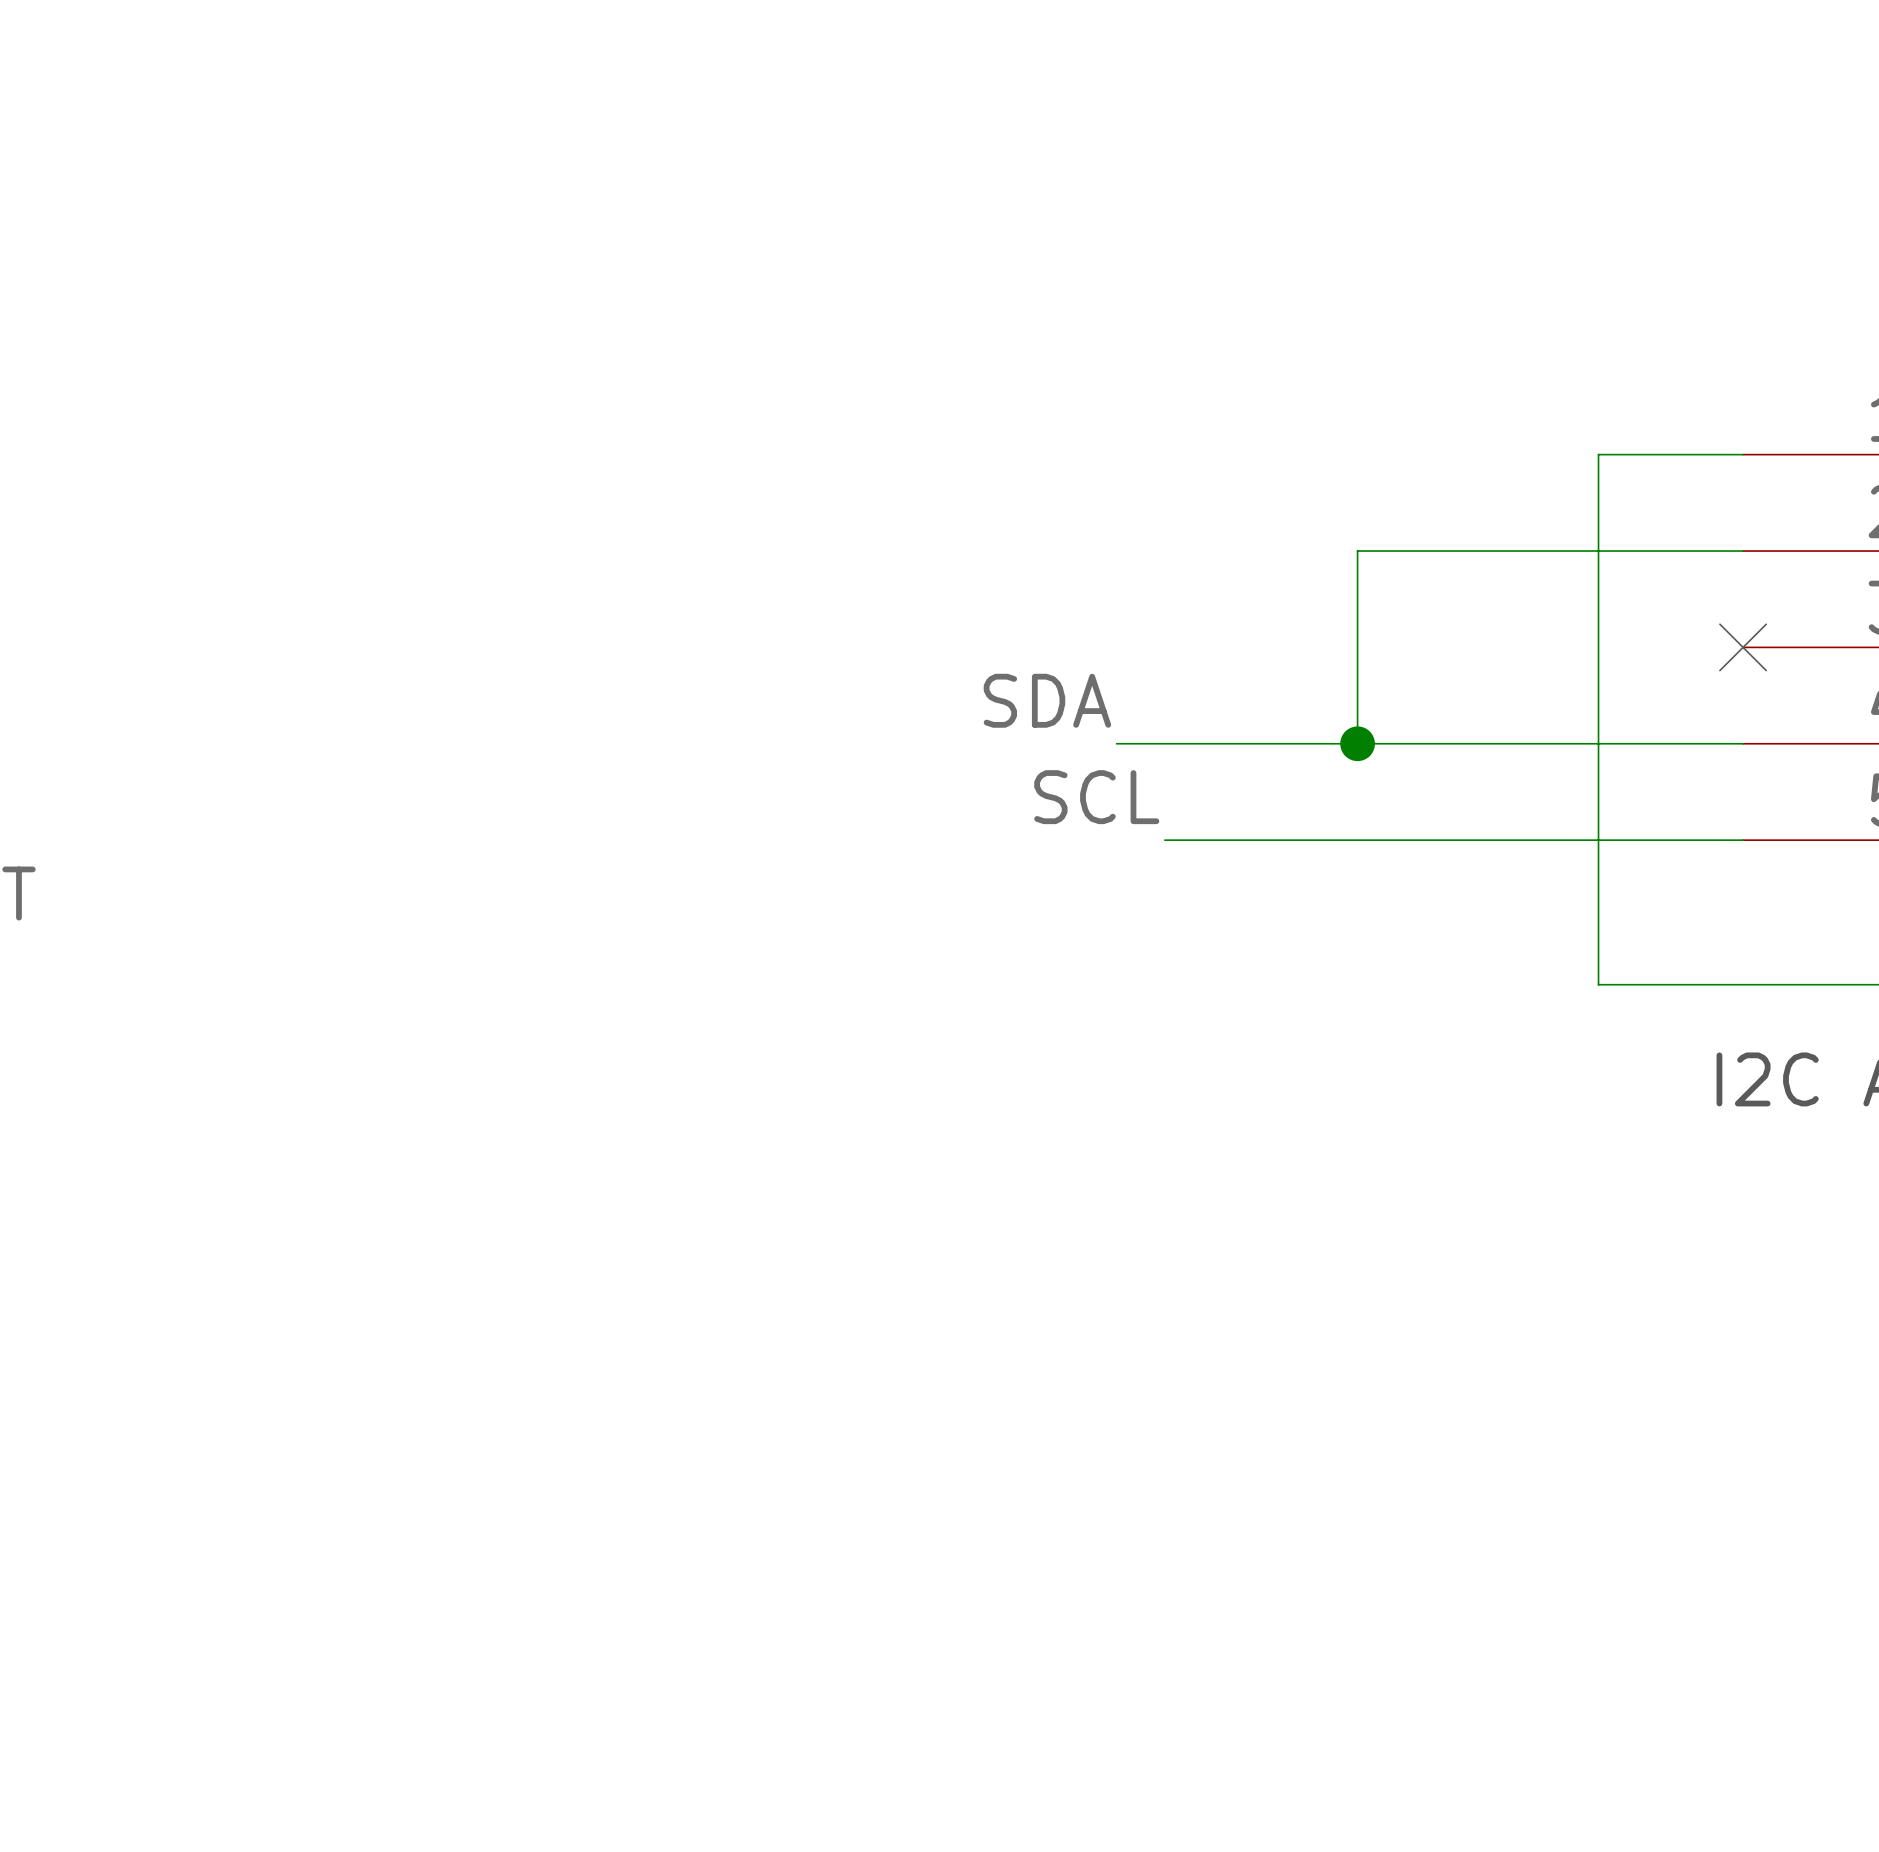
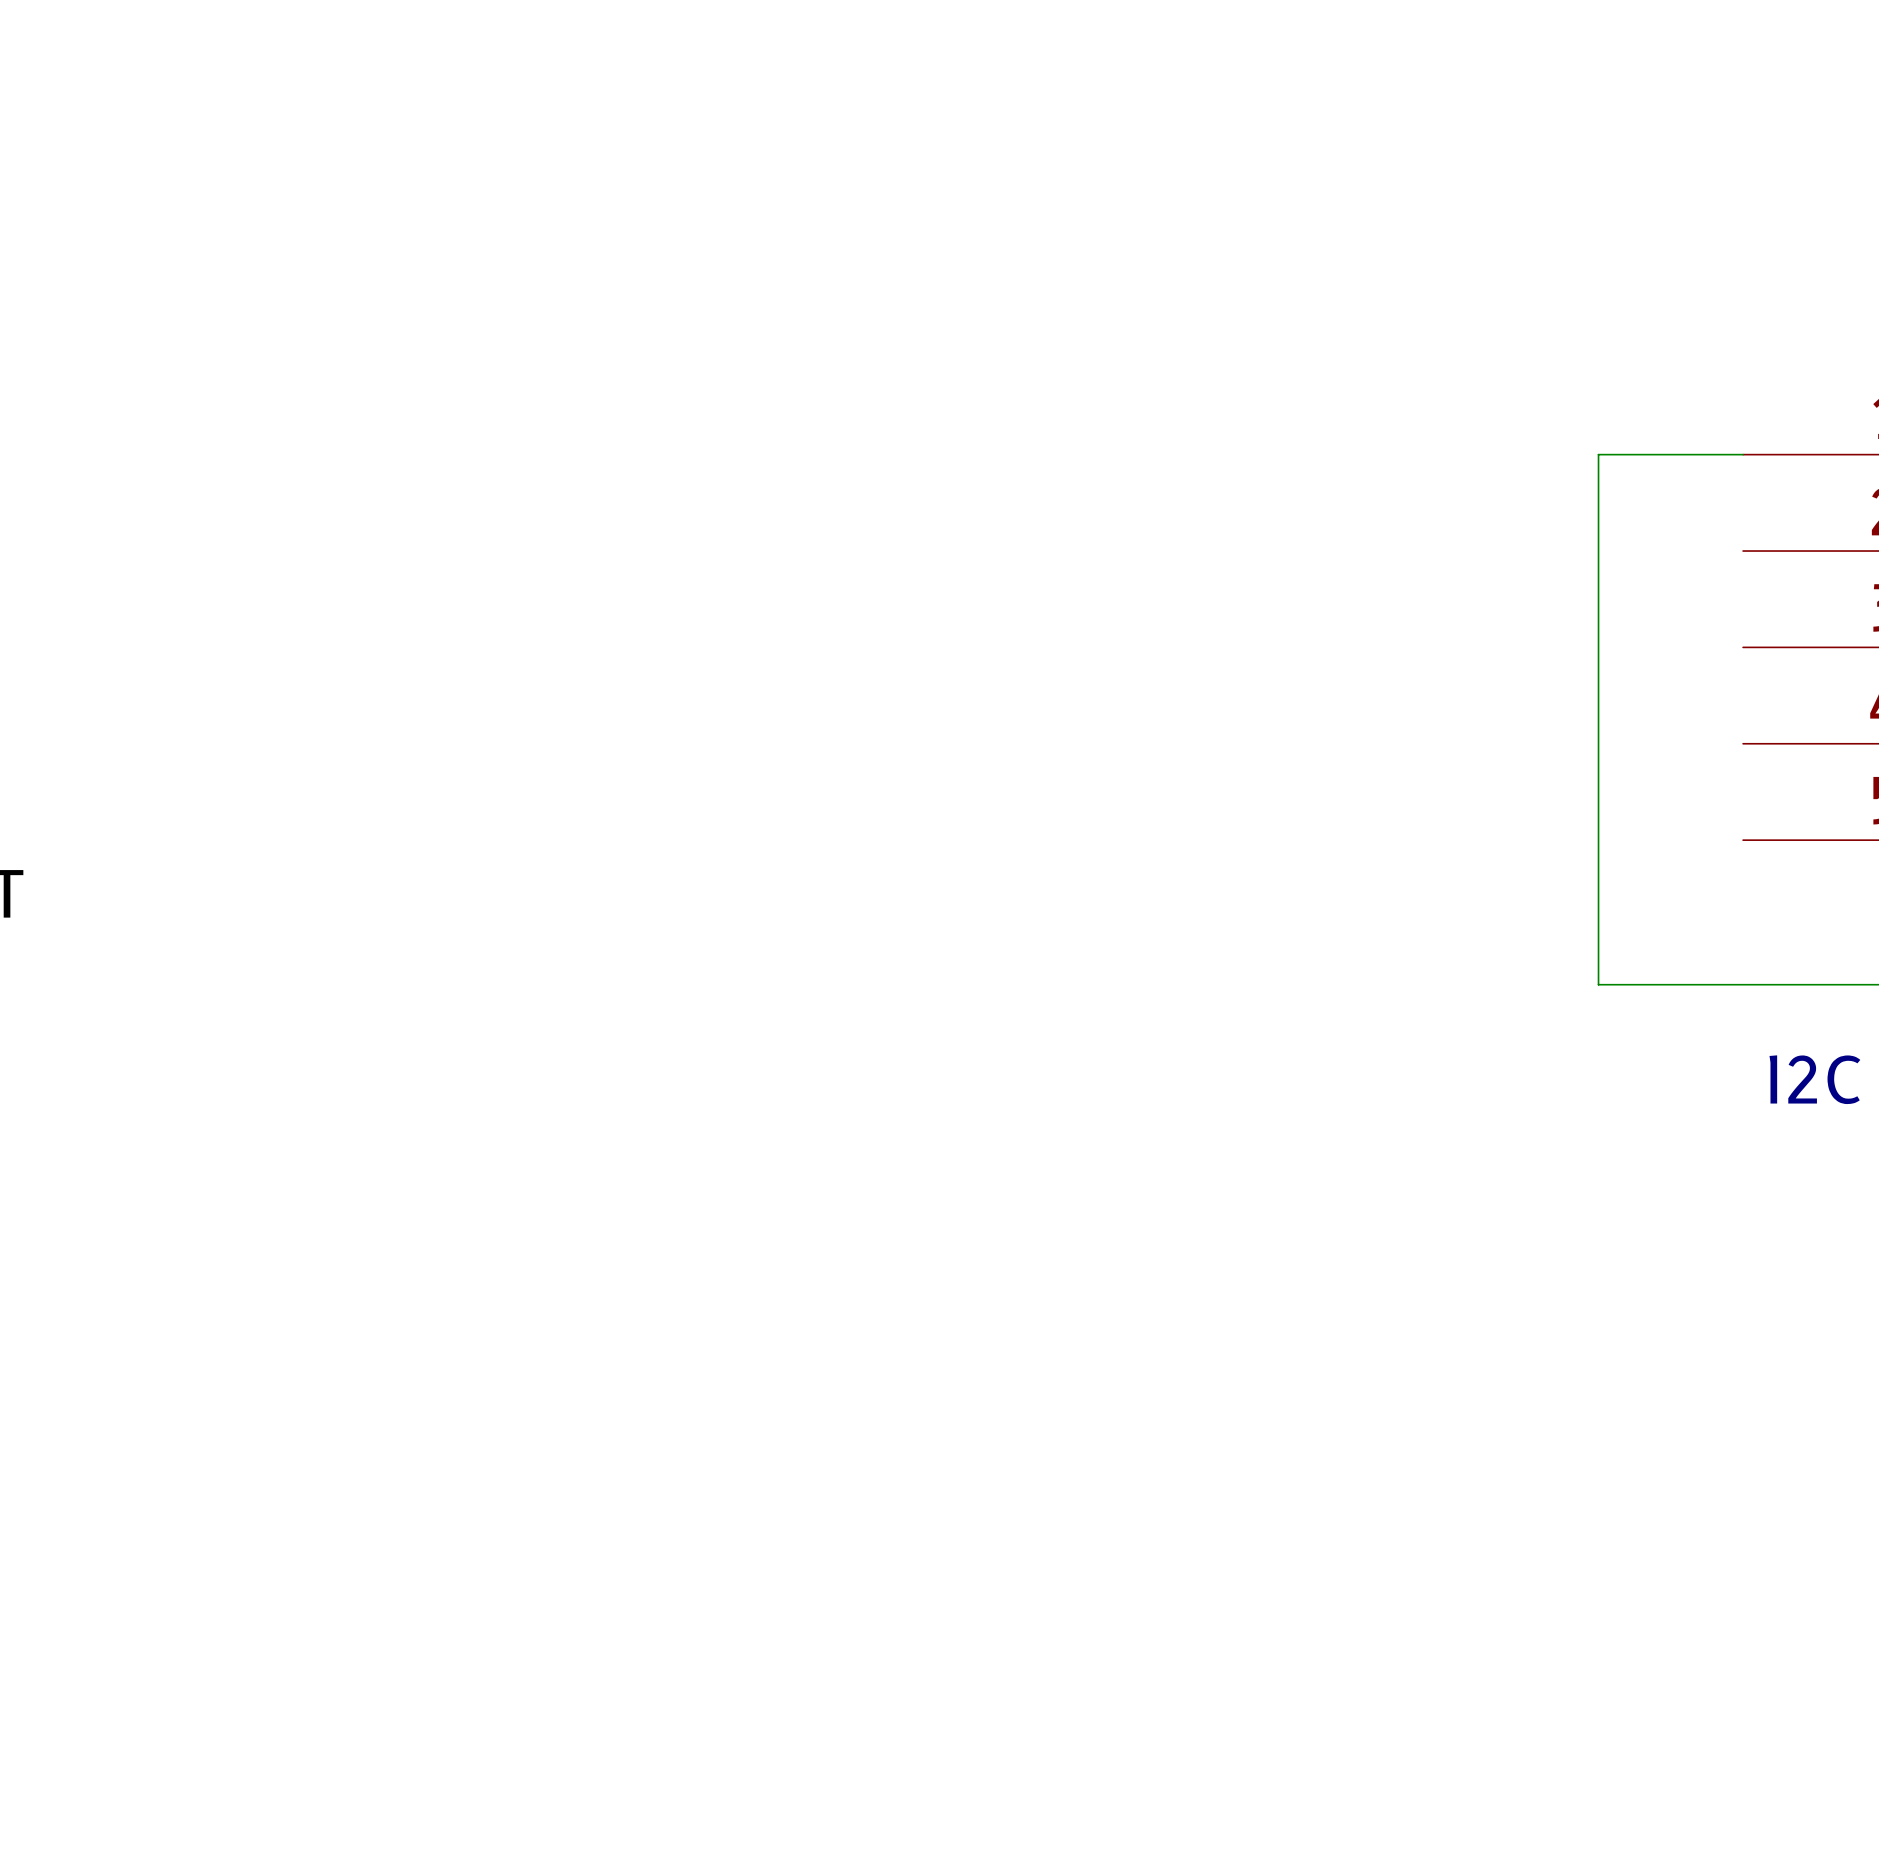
wire: (1743, 551) (1357, 551) (1357, 743) -> none
no-connect mark: (1743, 647) -> none
label: SDA (1047, 700) -> none
wire: (1116, 743) (1743, 743) -> none
junction: (1357, 743) -> none
label: SCL (1096, 797) -> none
wire: (1164, 840) (1743, 840) -> none

